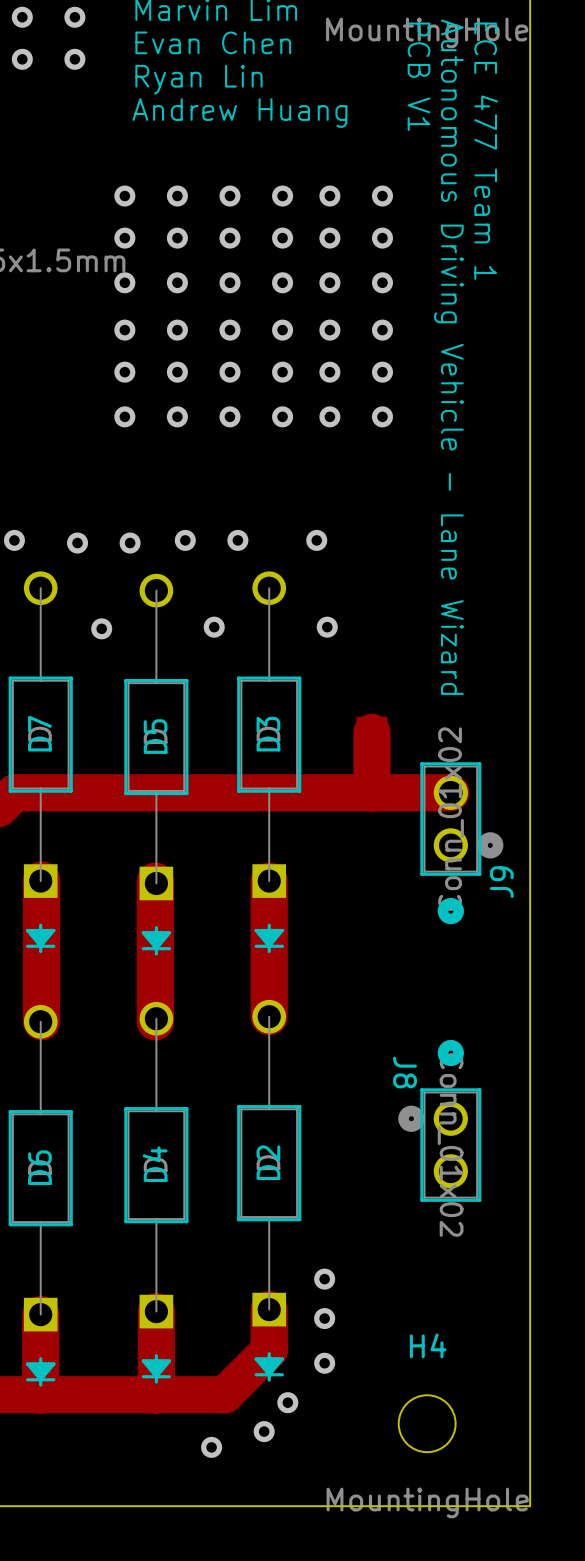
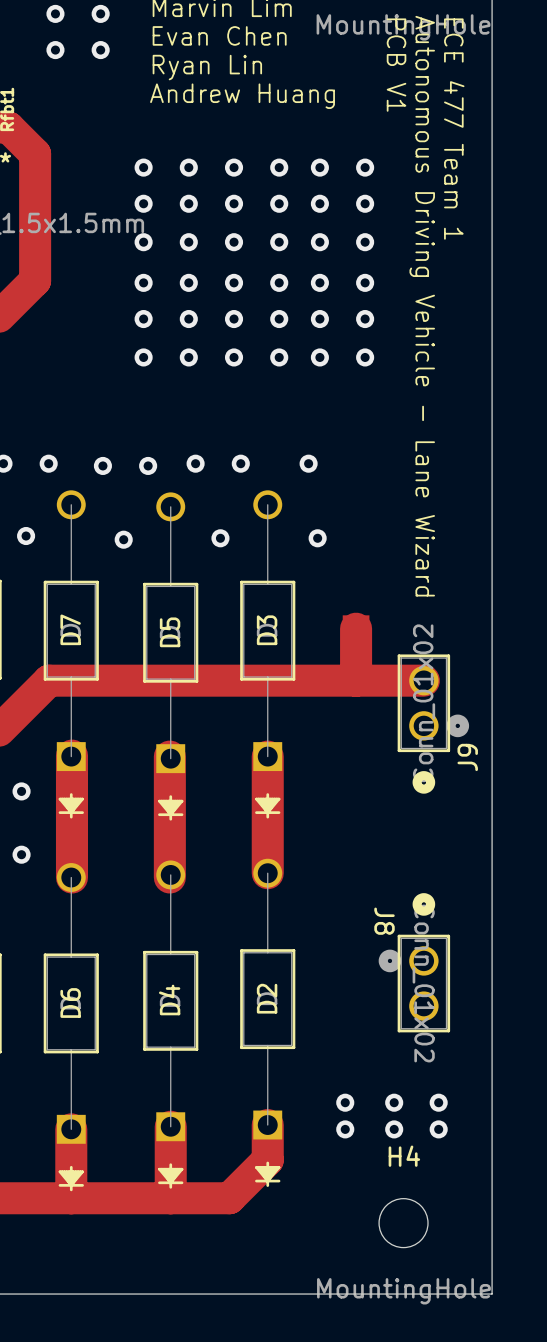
via: (324, 1279) -> none
via: none -> (345, 1102)
via: none -> (394, 1102)
via: none -> (438, 1102)
via: none -> (345, 1129)
via: none -> (394, 1129)
via: none -> (438, 1129)
via: (324, 1318) -> none
via: (324, 1363) -> none
via: (287, 1402) -> none
via: (264, 1431) -> none
via: (211, 1447) -> none

